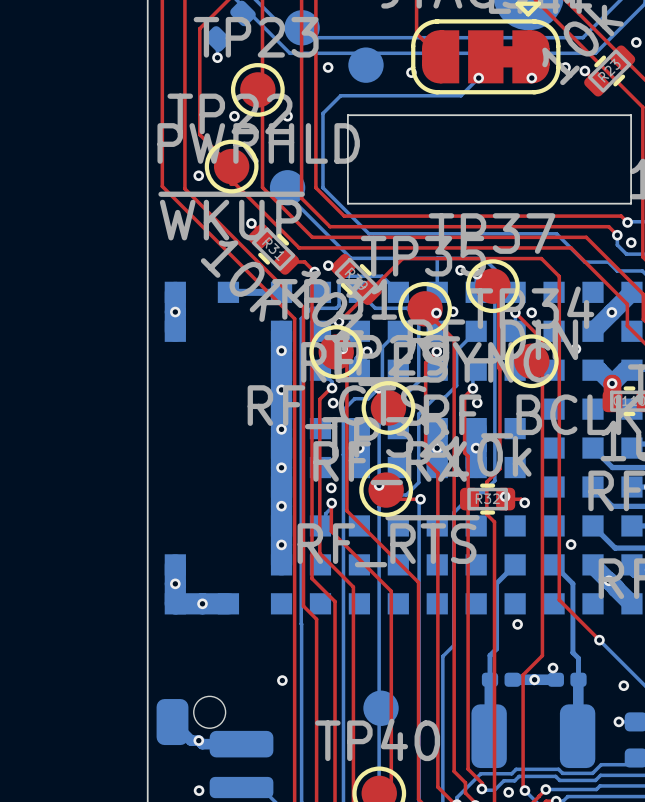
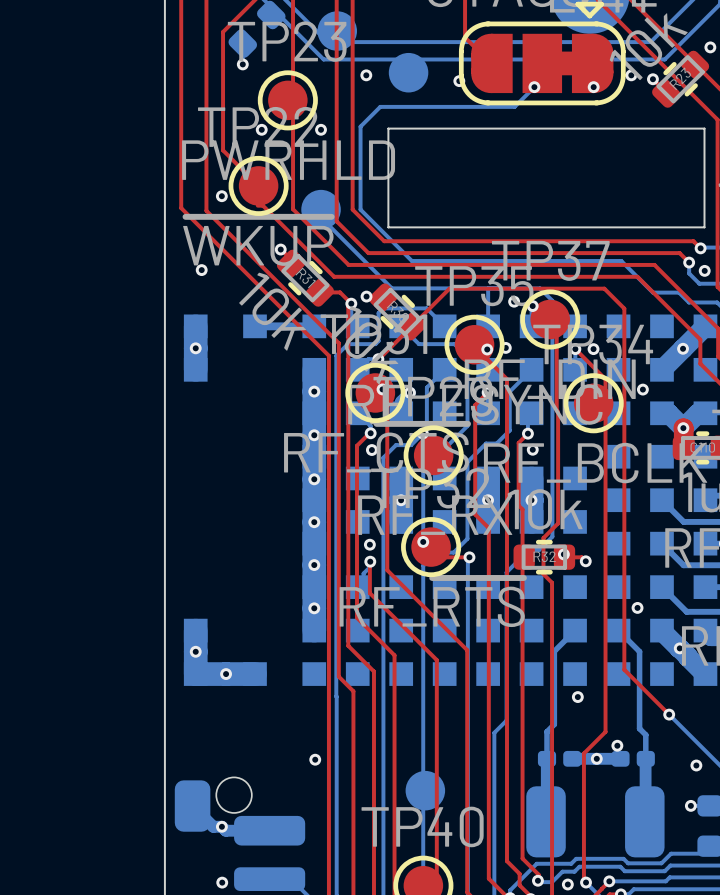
via: none -> (201, 270)

